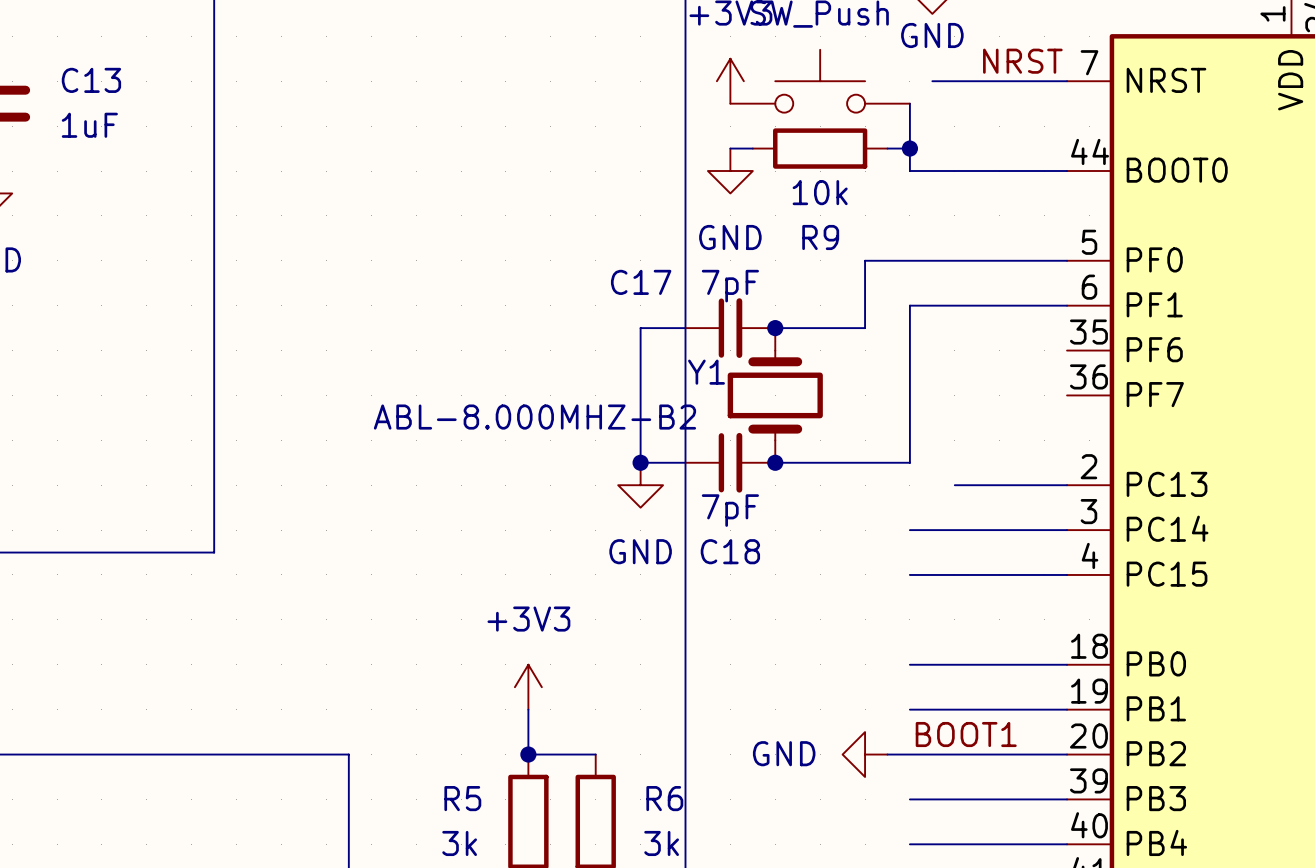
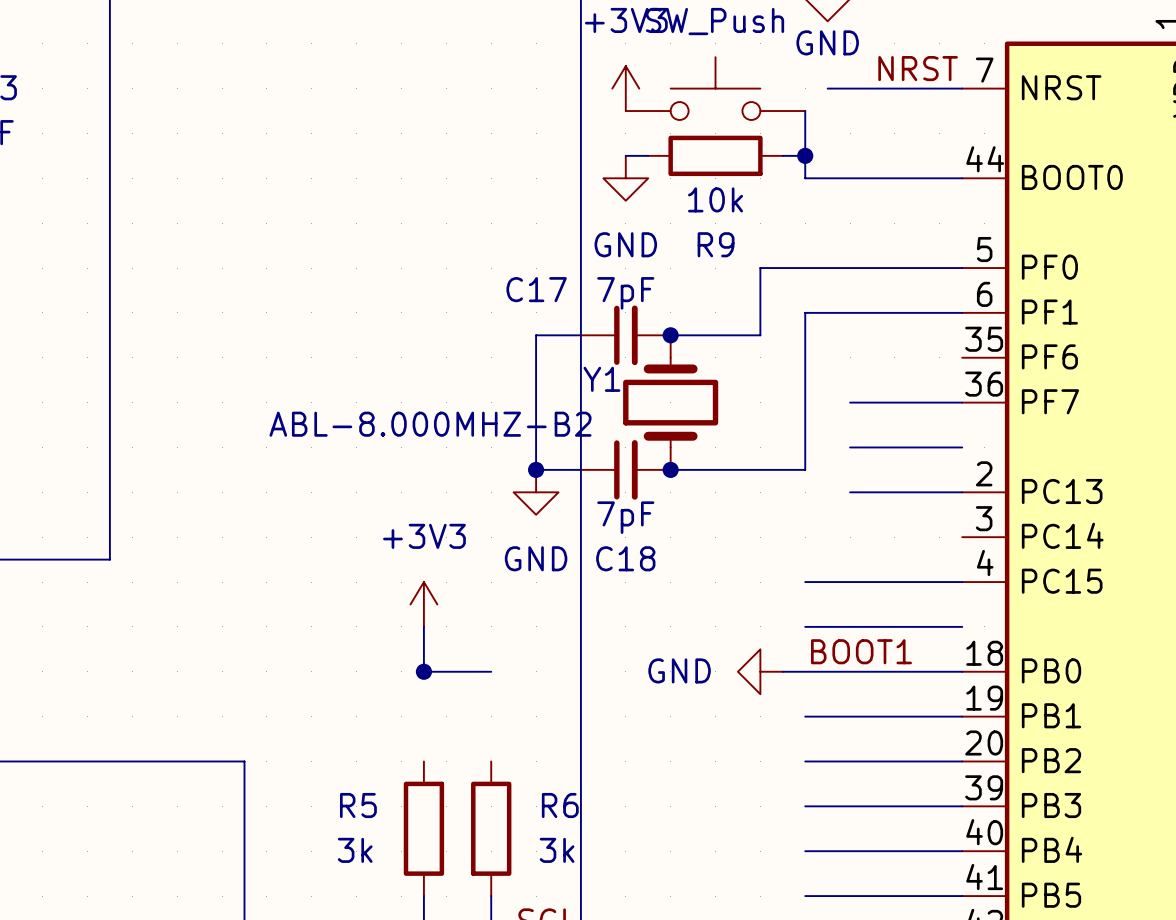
wire: none -> (850, 402) (962, 402)
wire: none -> (850, 447) (962, 447)
wire: (909, 530) (1067, 530) -> (805, 626) (962, 626)
power symbol position: +3V3 (528, 687) -> +3V3 (423, 604)
wire: (528, 709) (528, 754) (595, 754) -> (423, 626) (423, 671) (491, 671)
label position: BOOT1 (966, 734) -> BOOT1 (861, 651)
junction position: (528, 754) -> (423, 671)
power symbol position: GND (865, 754) -> GND (760, 671)
wire: (887, 754) (909, 754) -> (782, 671) (805, 671)

